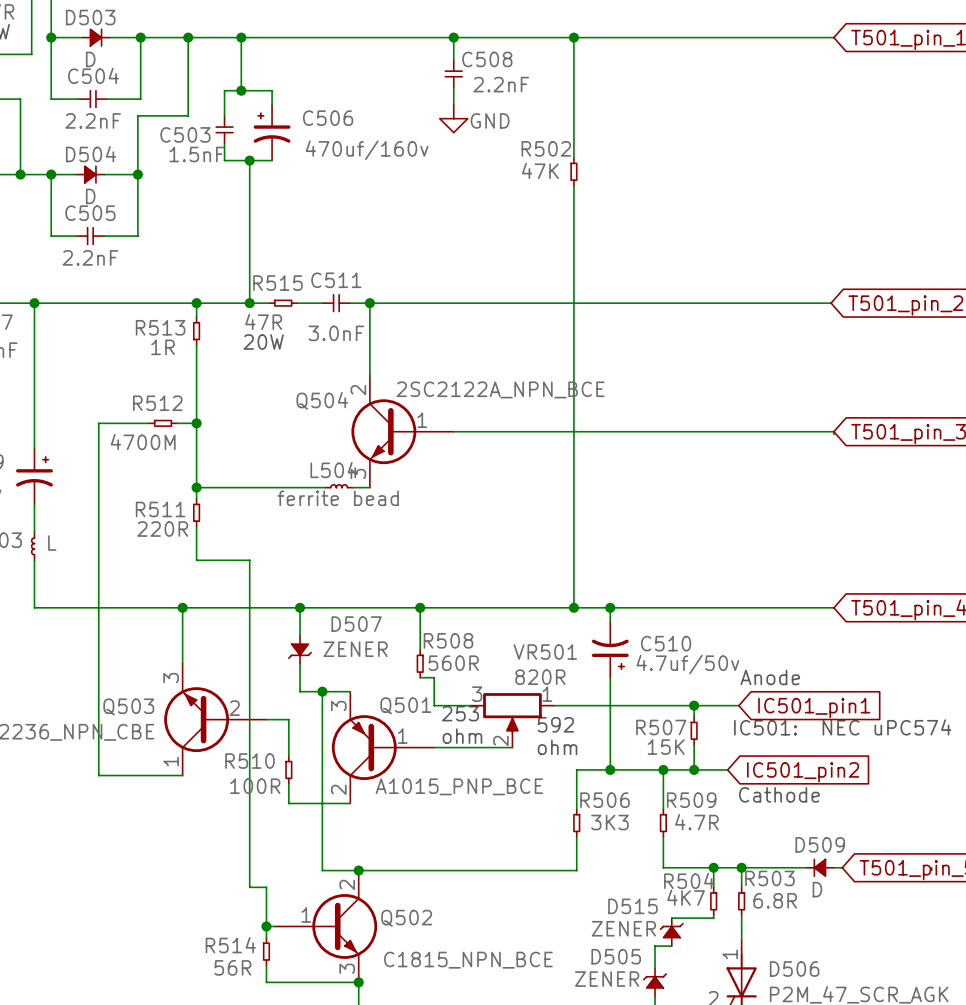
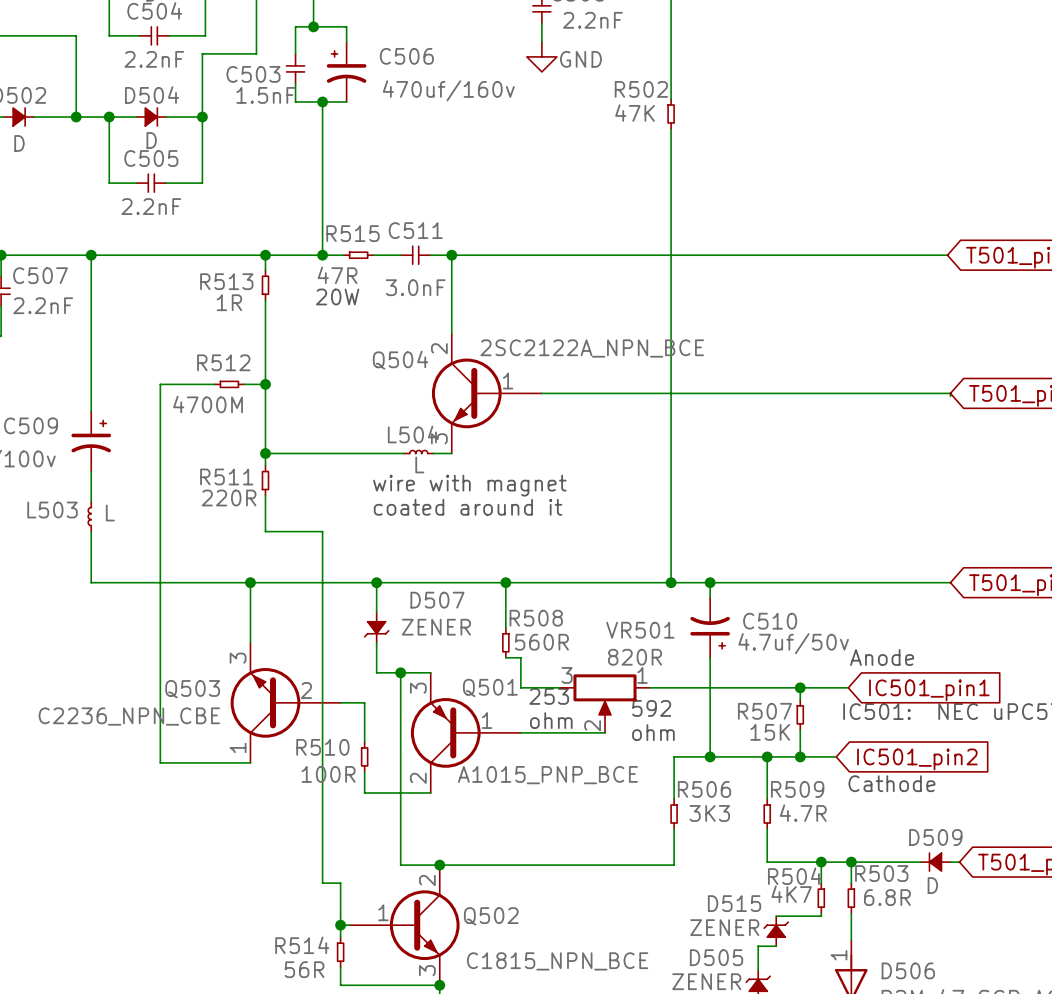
L504 value: ferrite bead (338, 498) -> L (419, 464)
text: none -> wire with magnet (469, 485)
text: none -> coated around it (468, 507)

